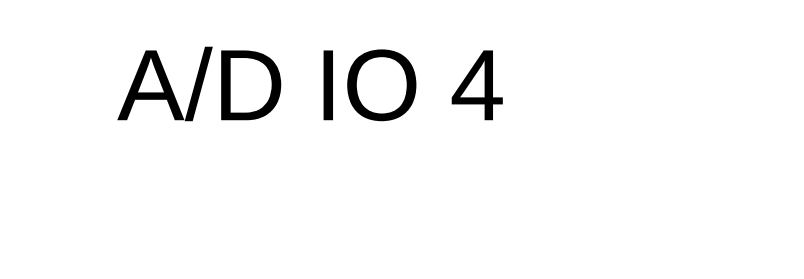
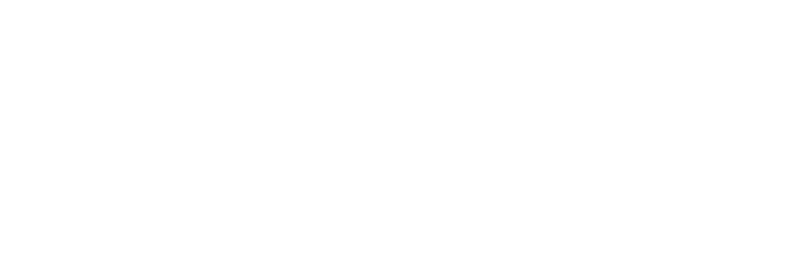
text: A/D IO 4 (310, 83) -> none

